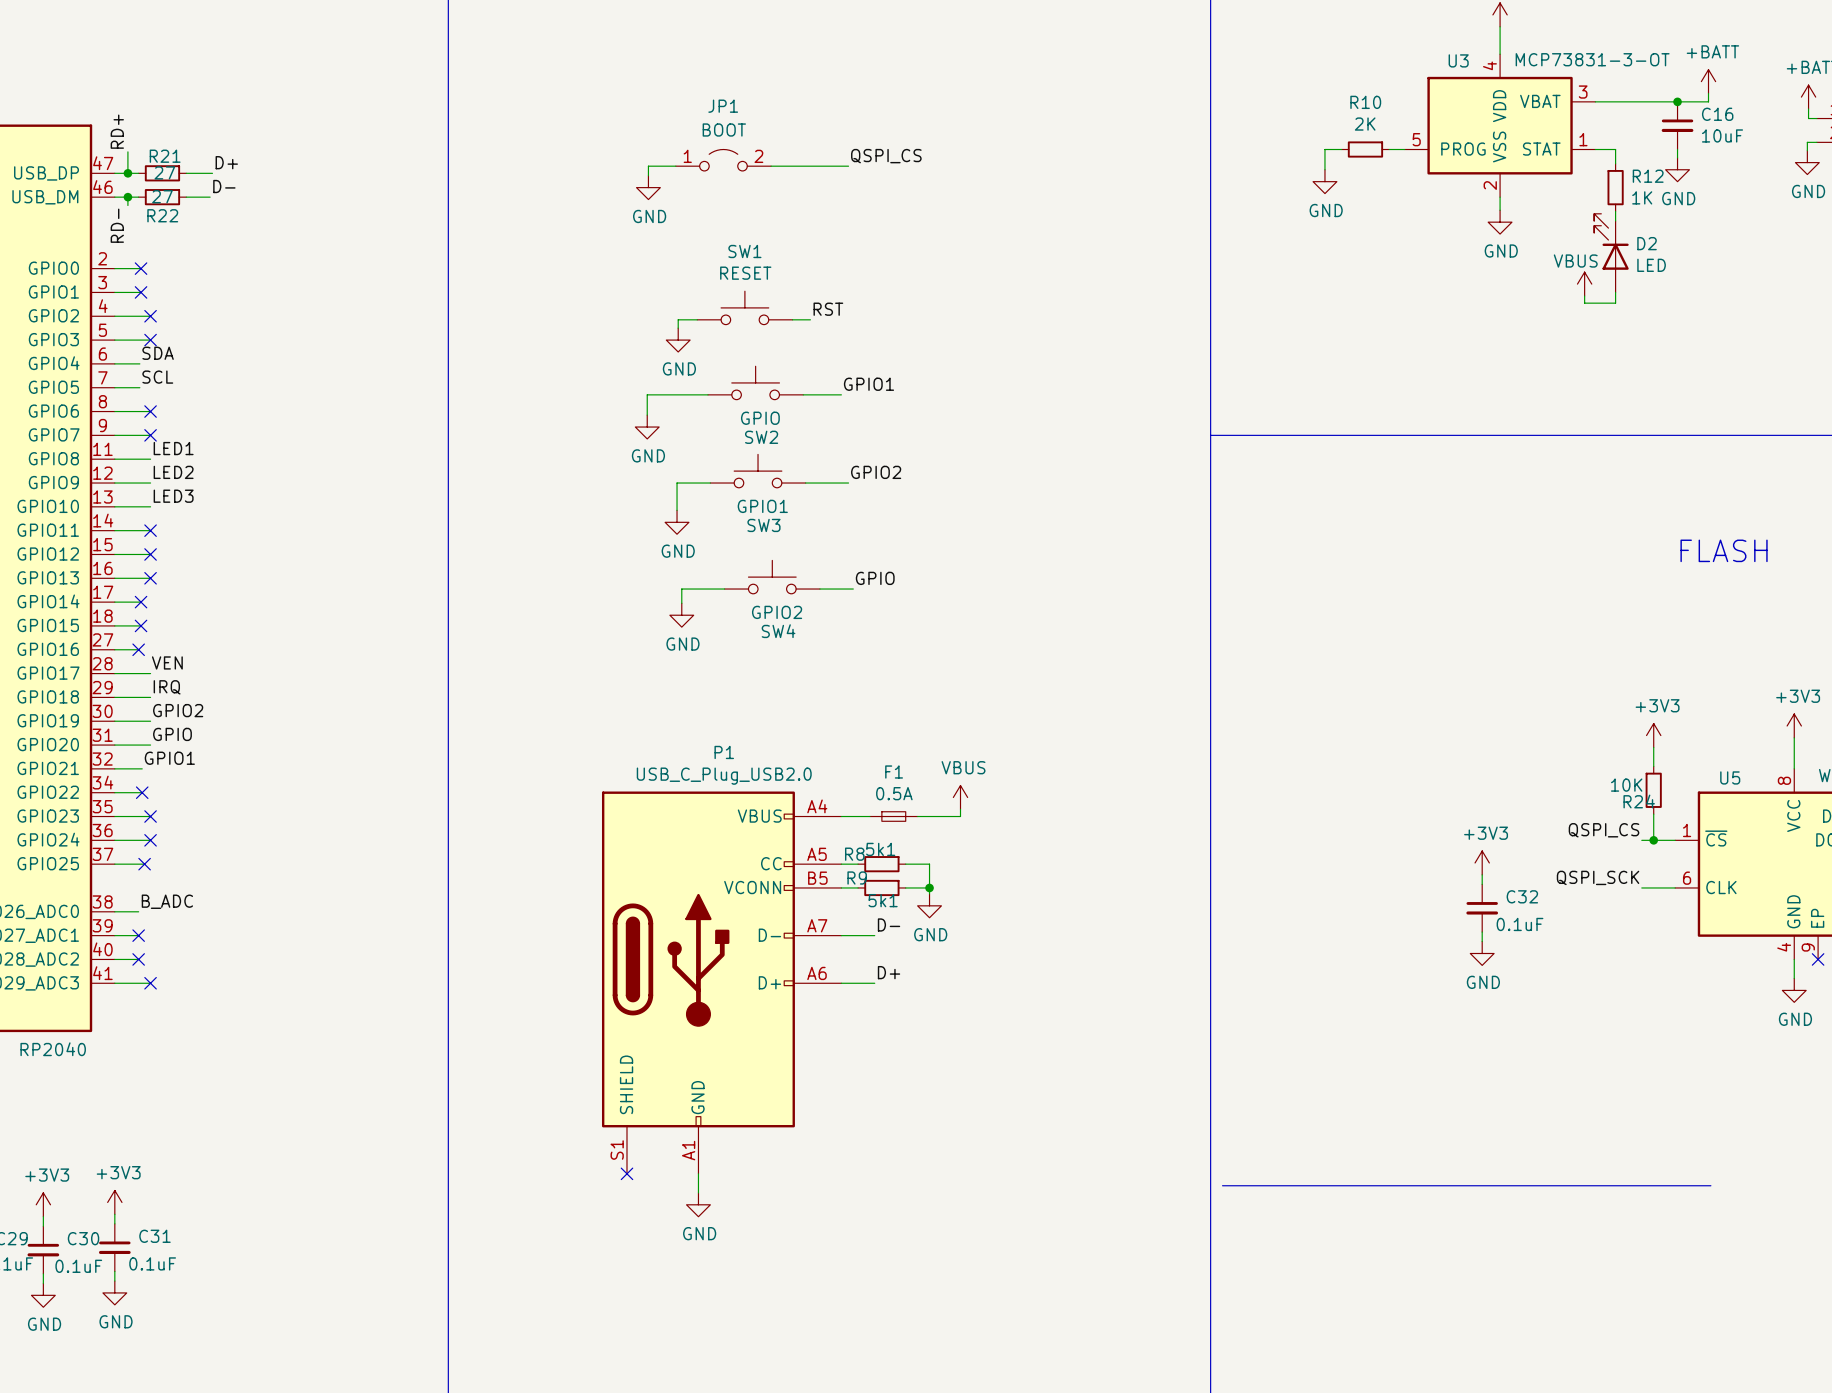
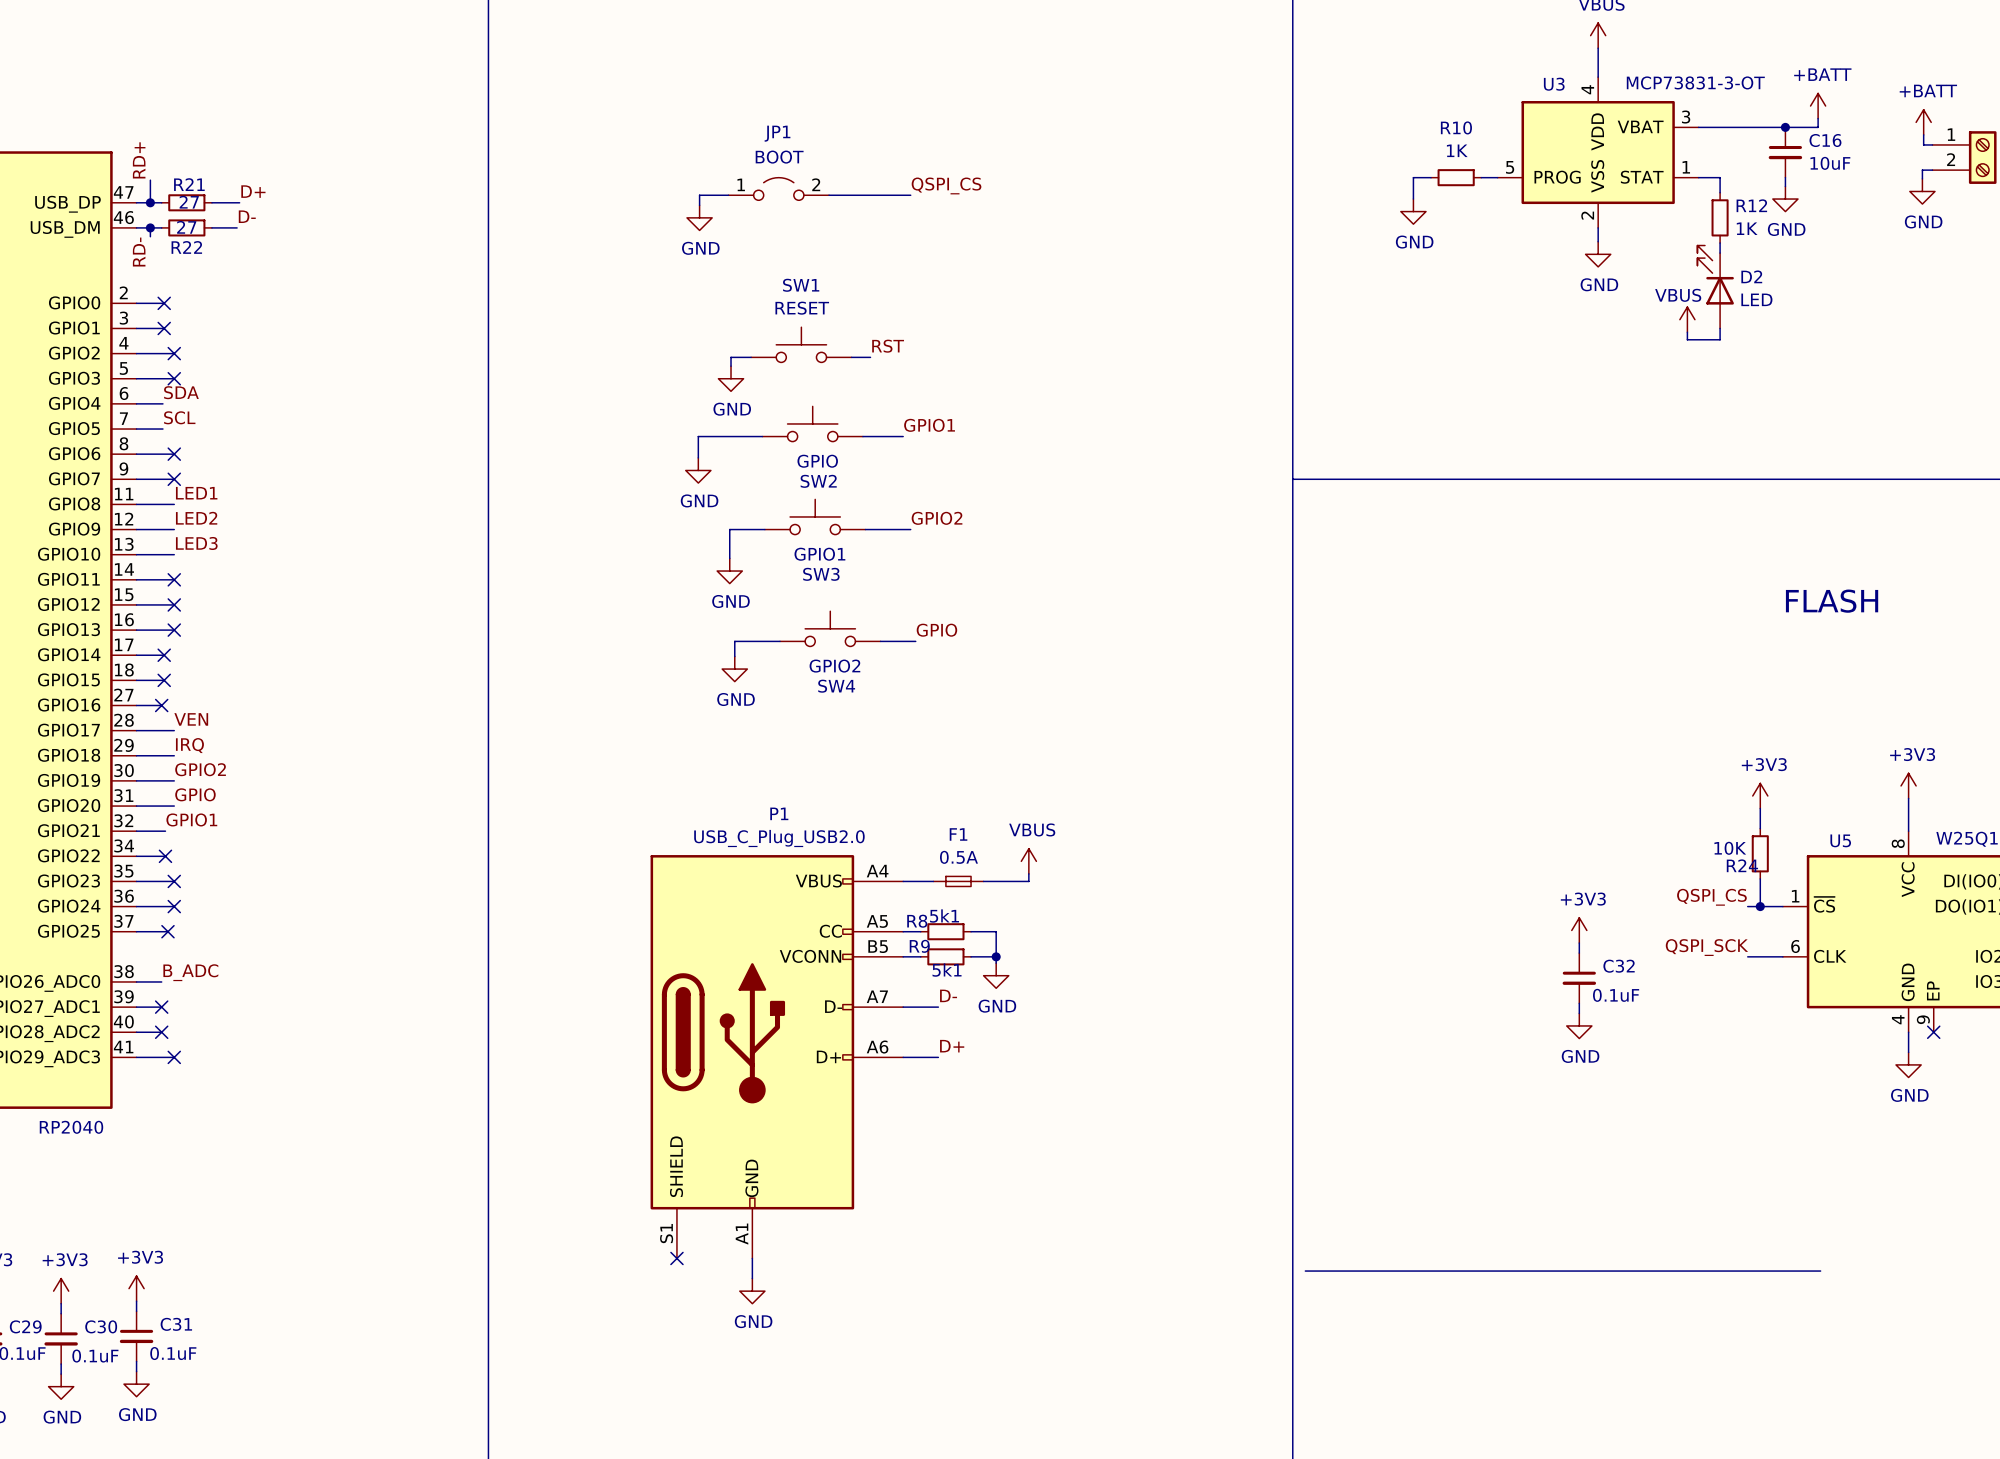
R10 value: 2K (1365, 124) -> 1K (1457, 150)

